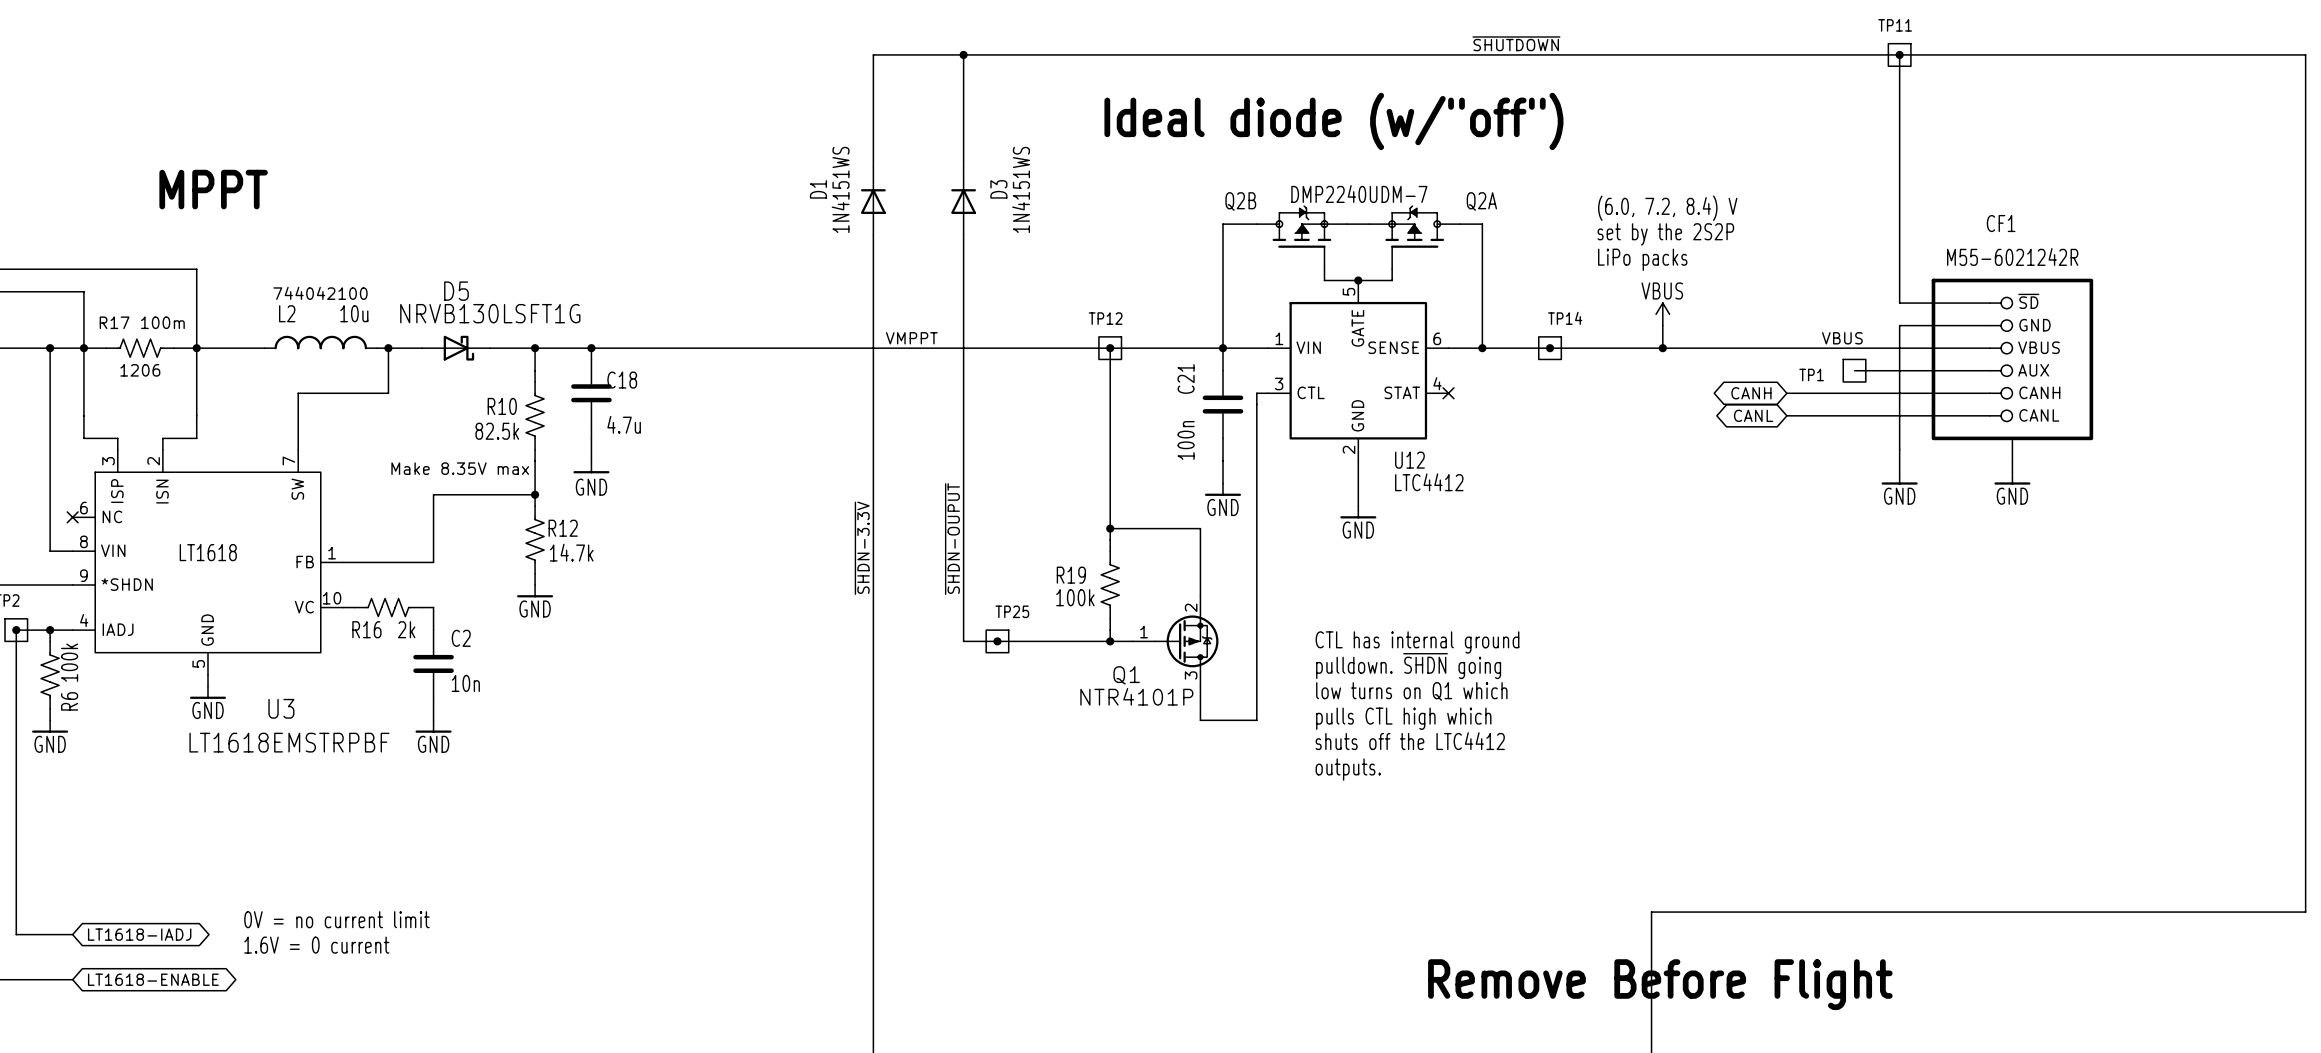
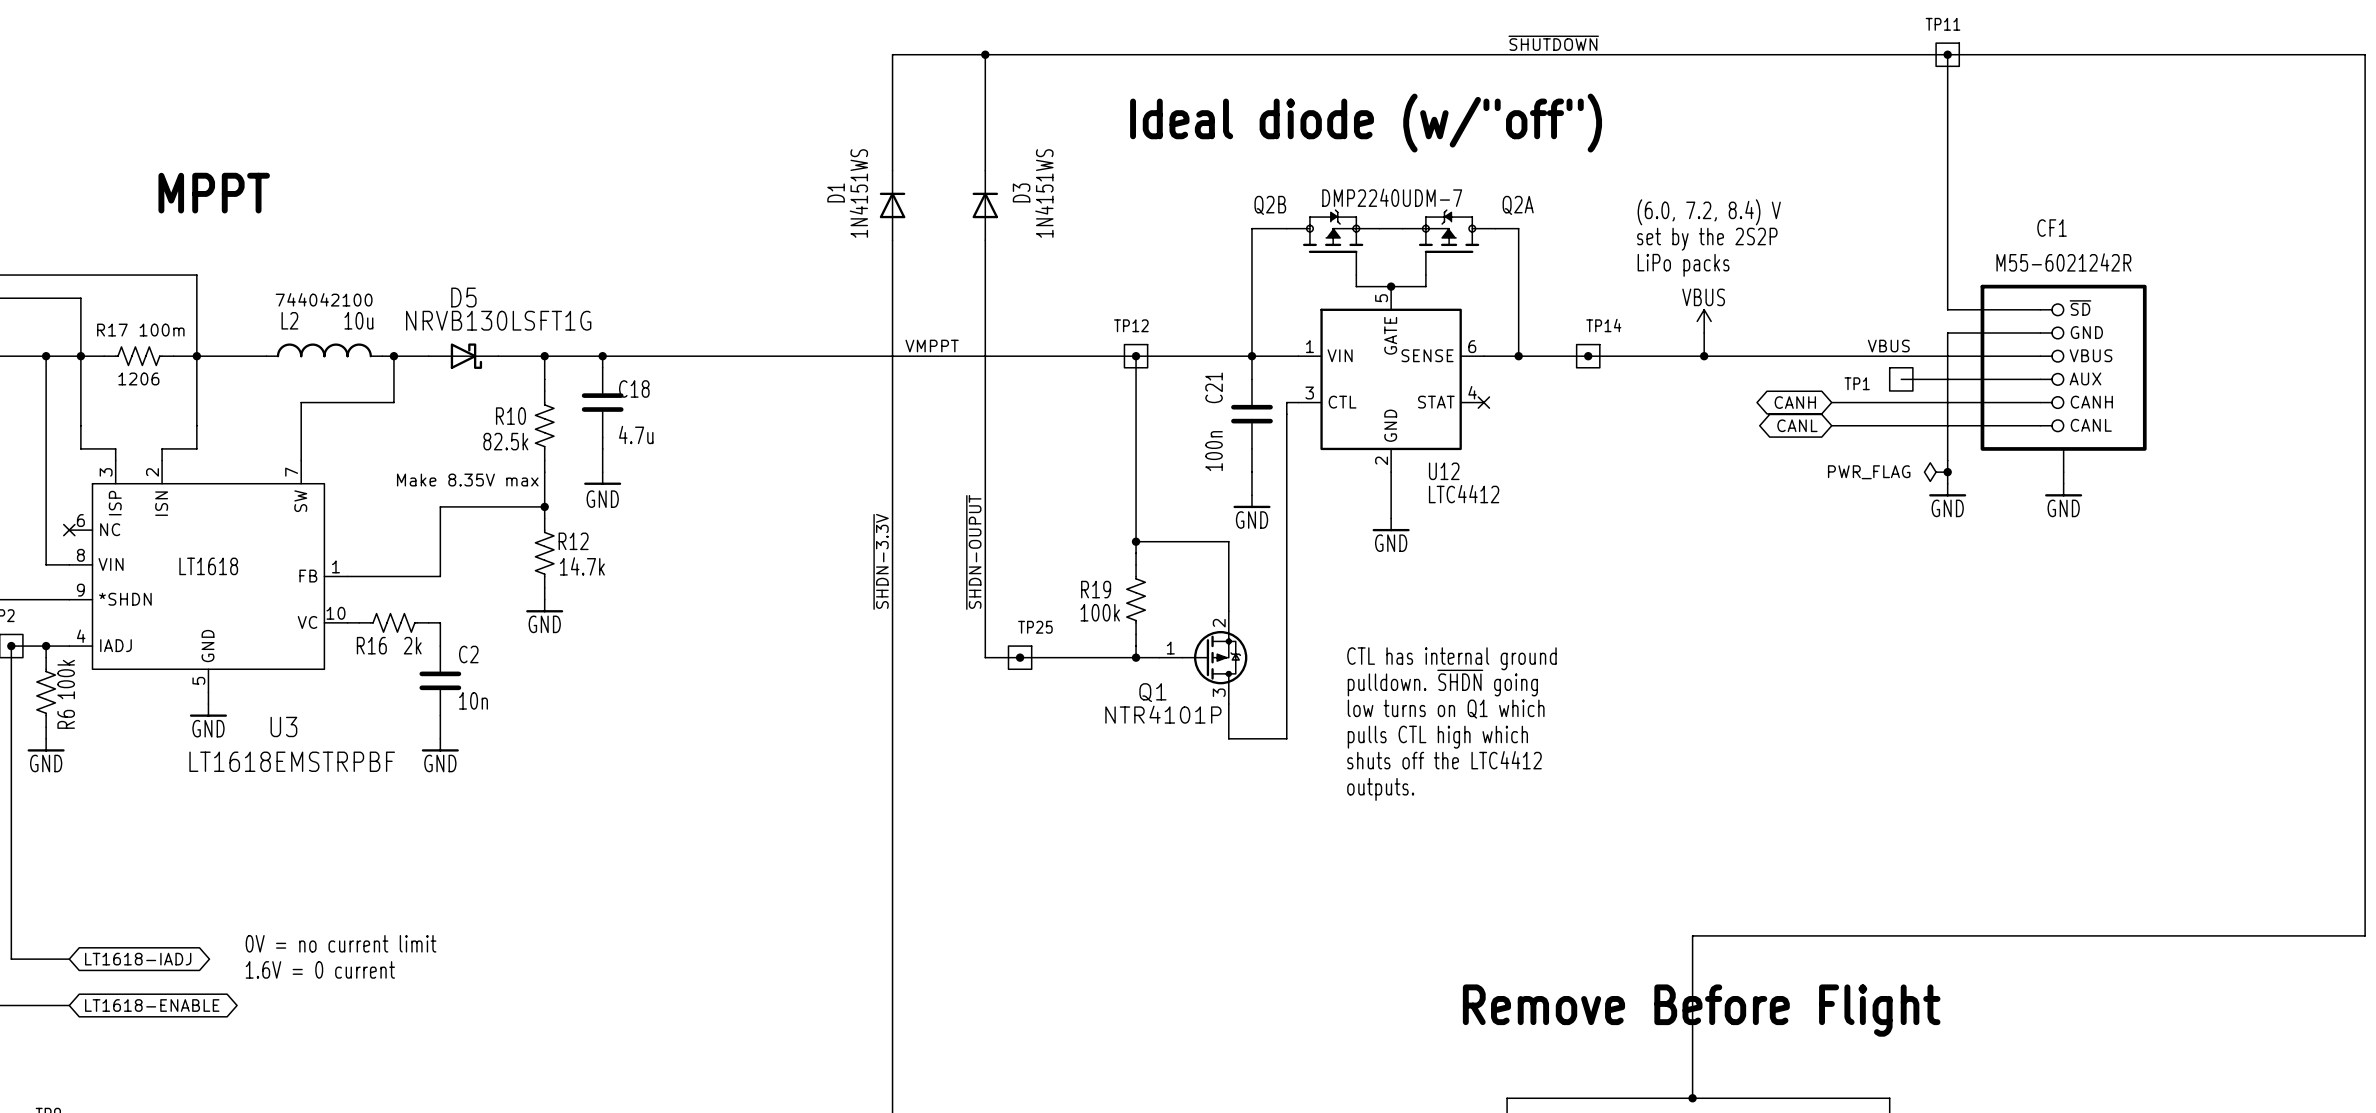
power symbol: none -> PWR_FLAG (1936, 472)
junction: none -> (1947, 472)

